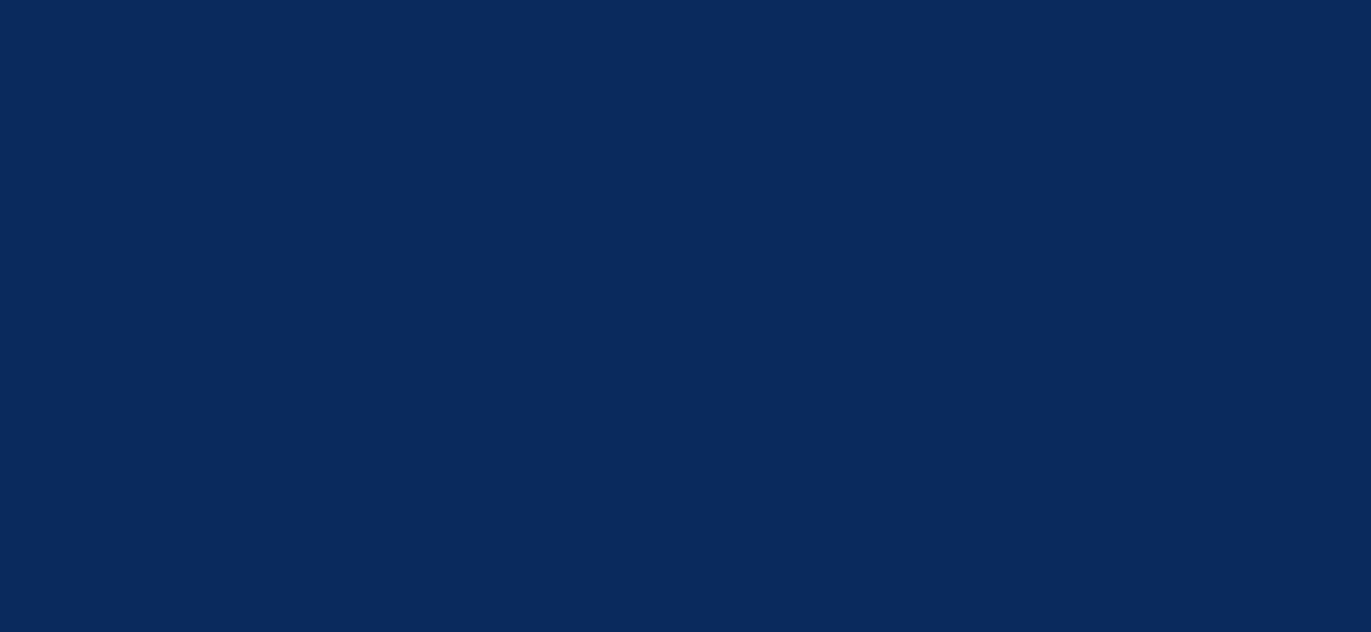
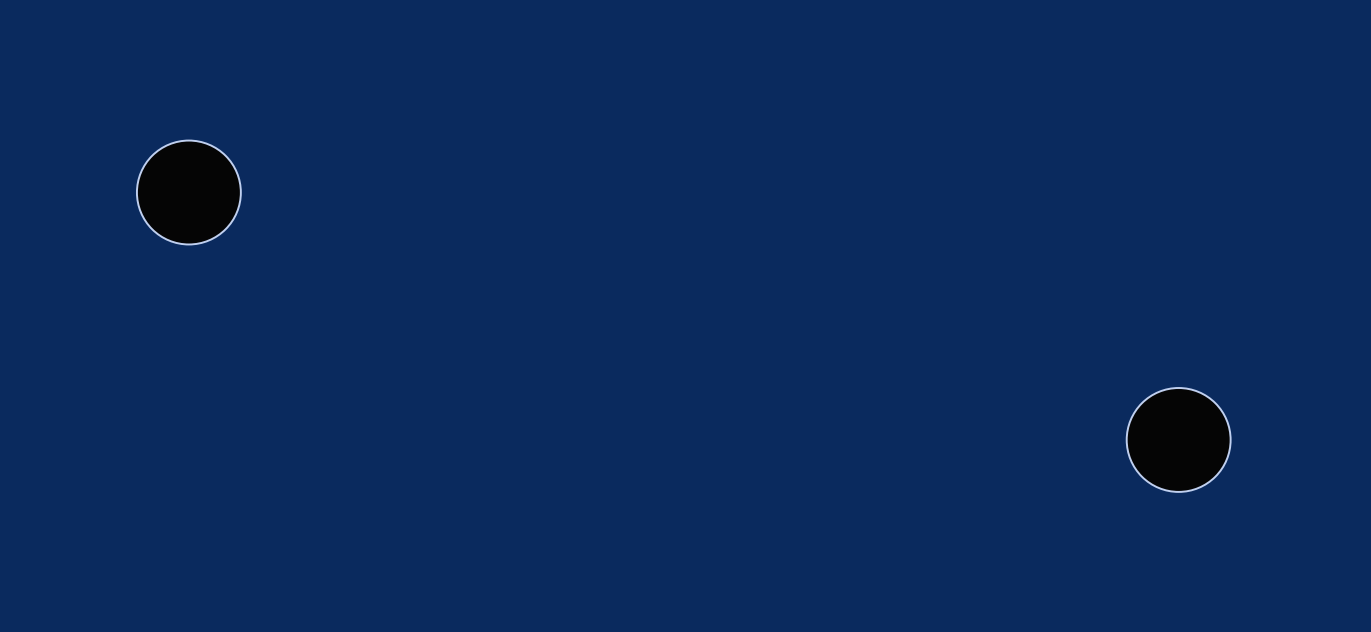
part: none -> (188, 192)
part: none -> (1178, 439)

